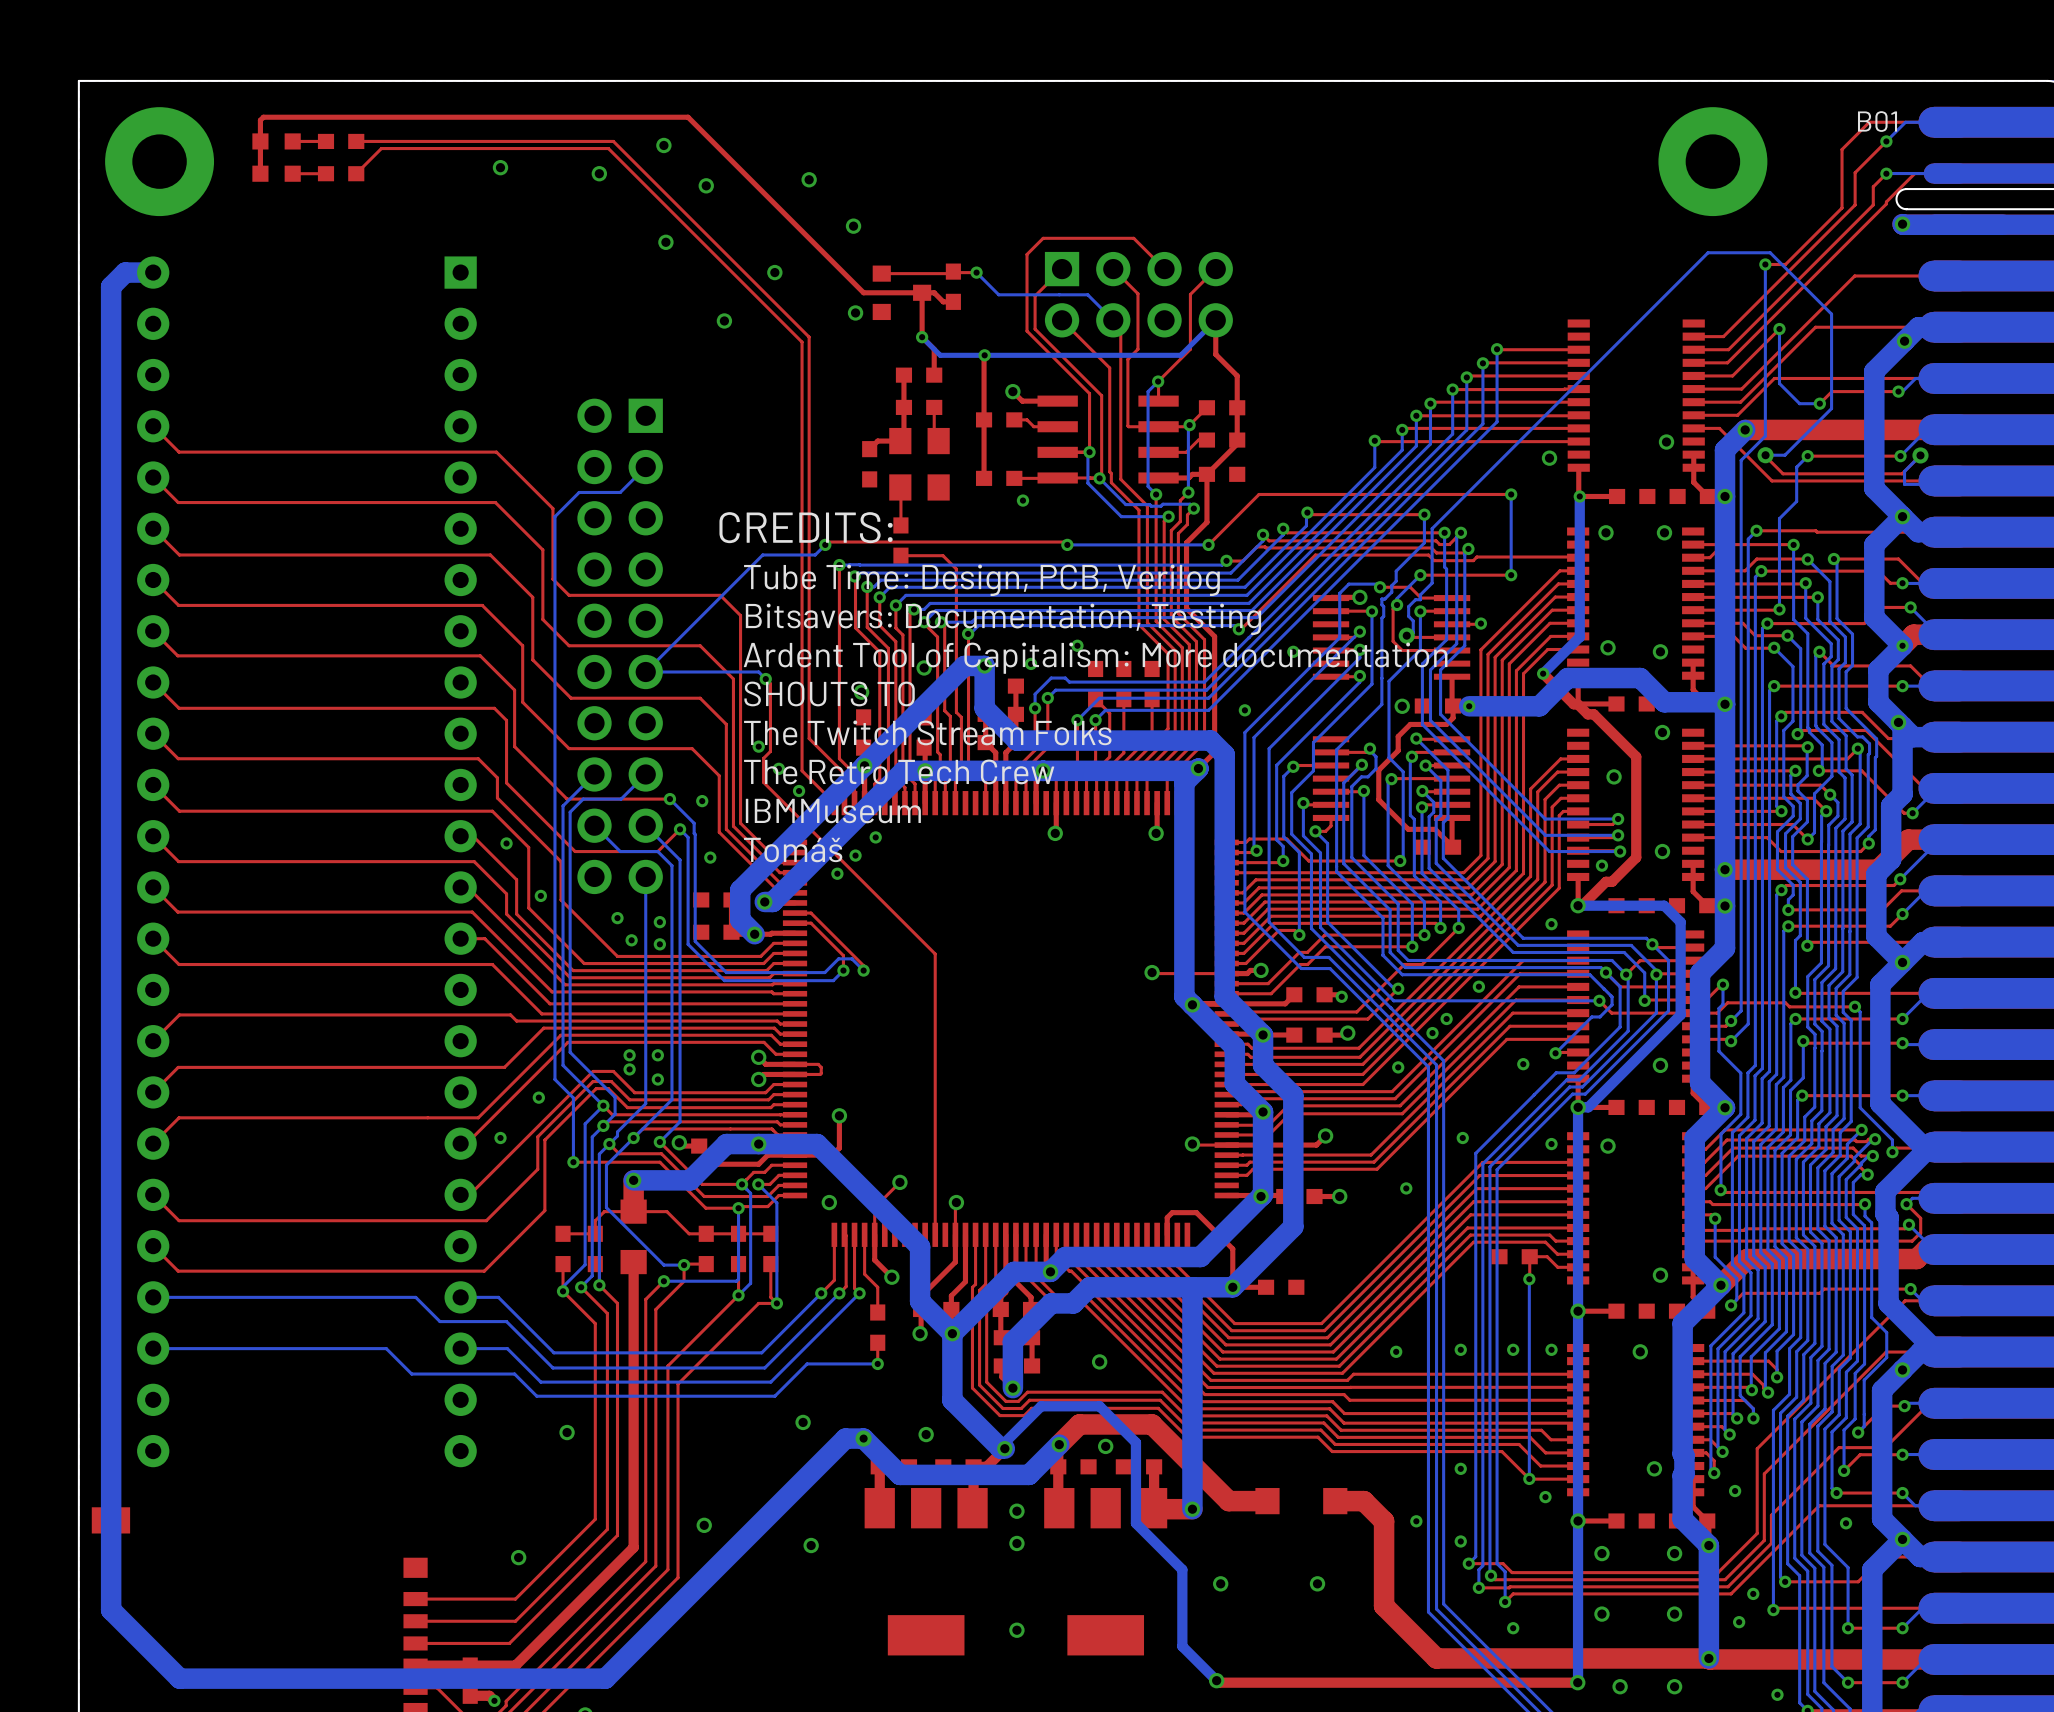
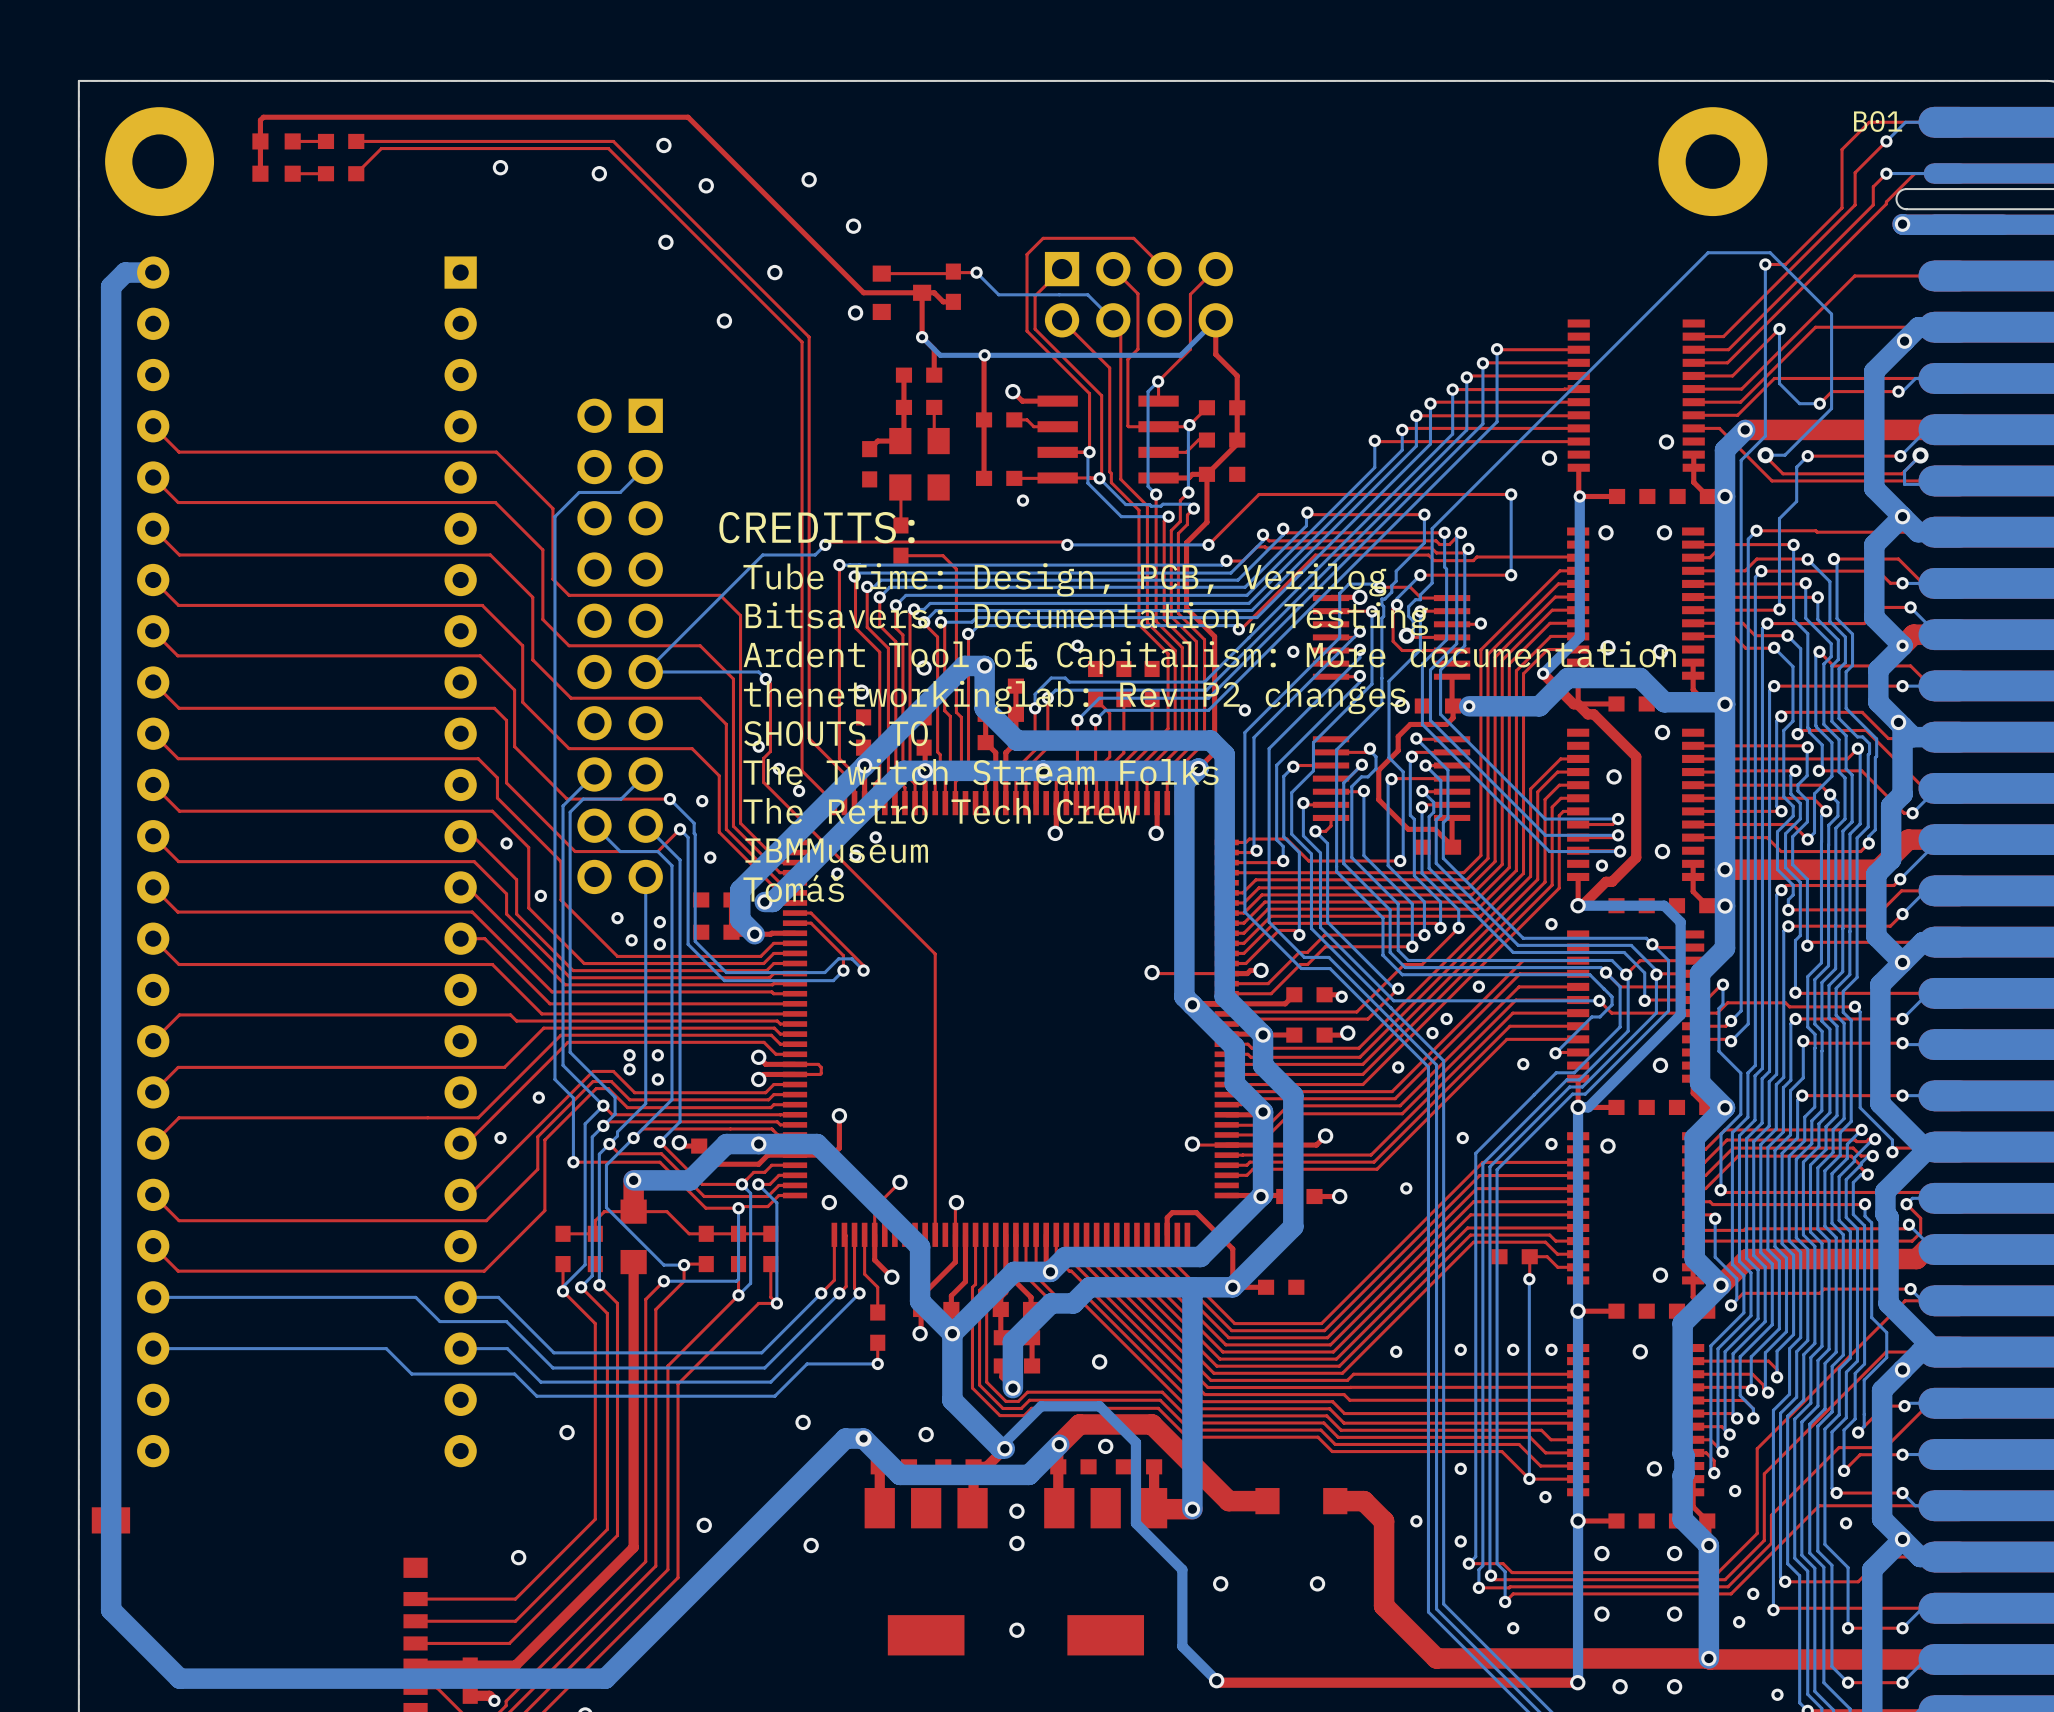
text: SHOUTS TO (829, 693) -> thenetworkinglab: Rev P2 changes (1074, 697)
text: The Twitch Stream Folks (927, 732) -> SHOUTS TO (836, 733)
text: The Retro Tech Crew (899, 771) -> The Twitch Stream Folks (981, 771)
text: IBMMuseum (833, 811) -> The Retro Tech Crew (940, 811)
text: Tomáš (793, 850) -> IBMMuseum (836, 850)
text: none -> Tomáš (793, 888)

